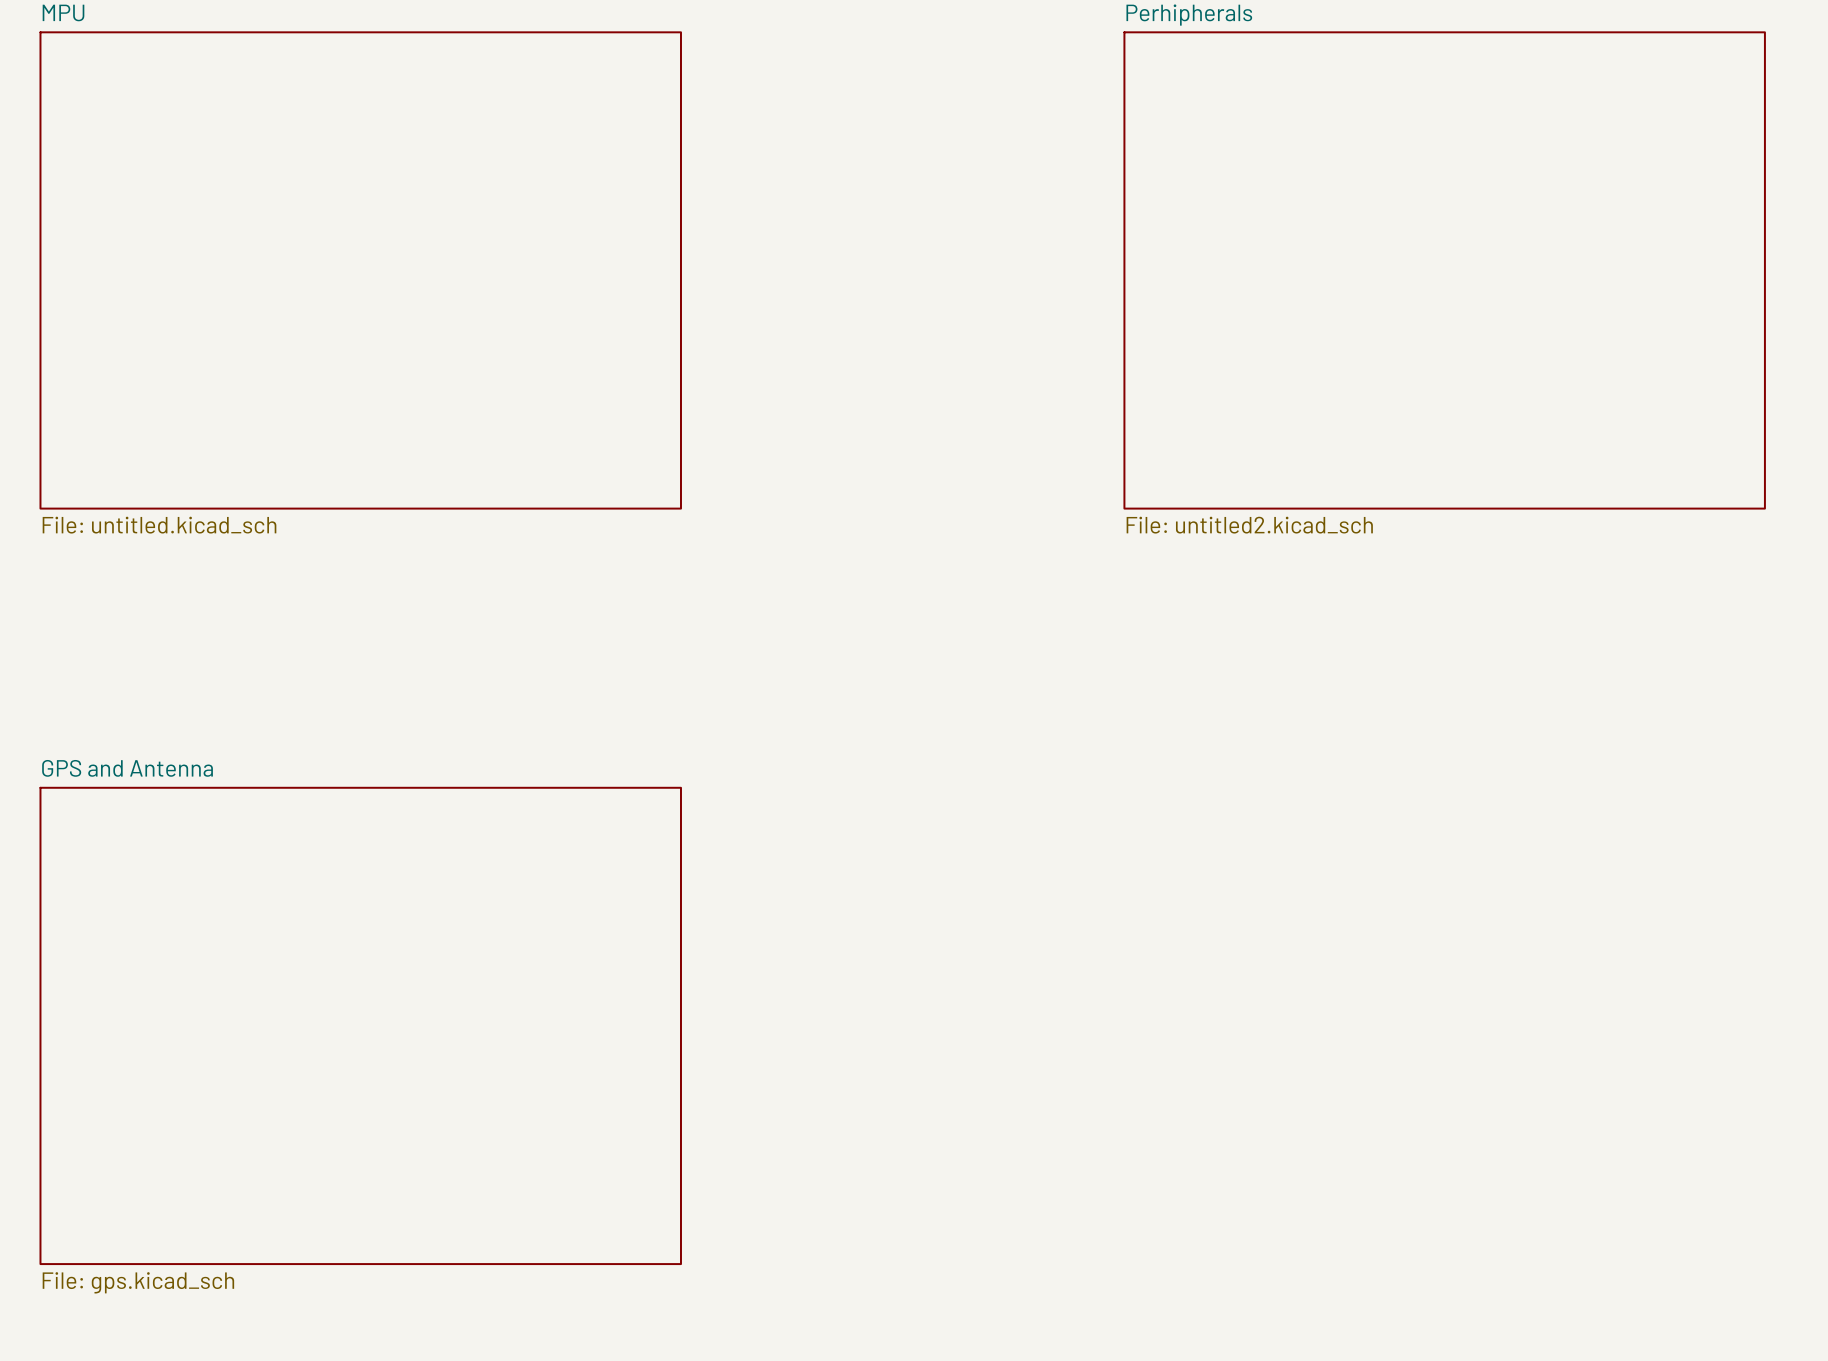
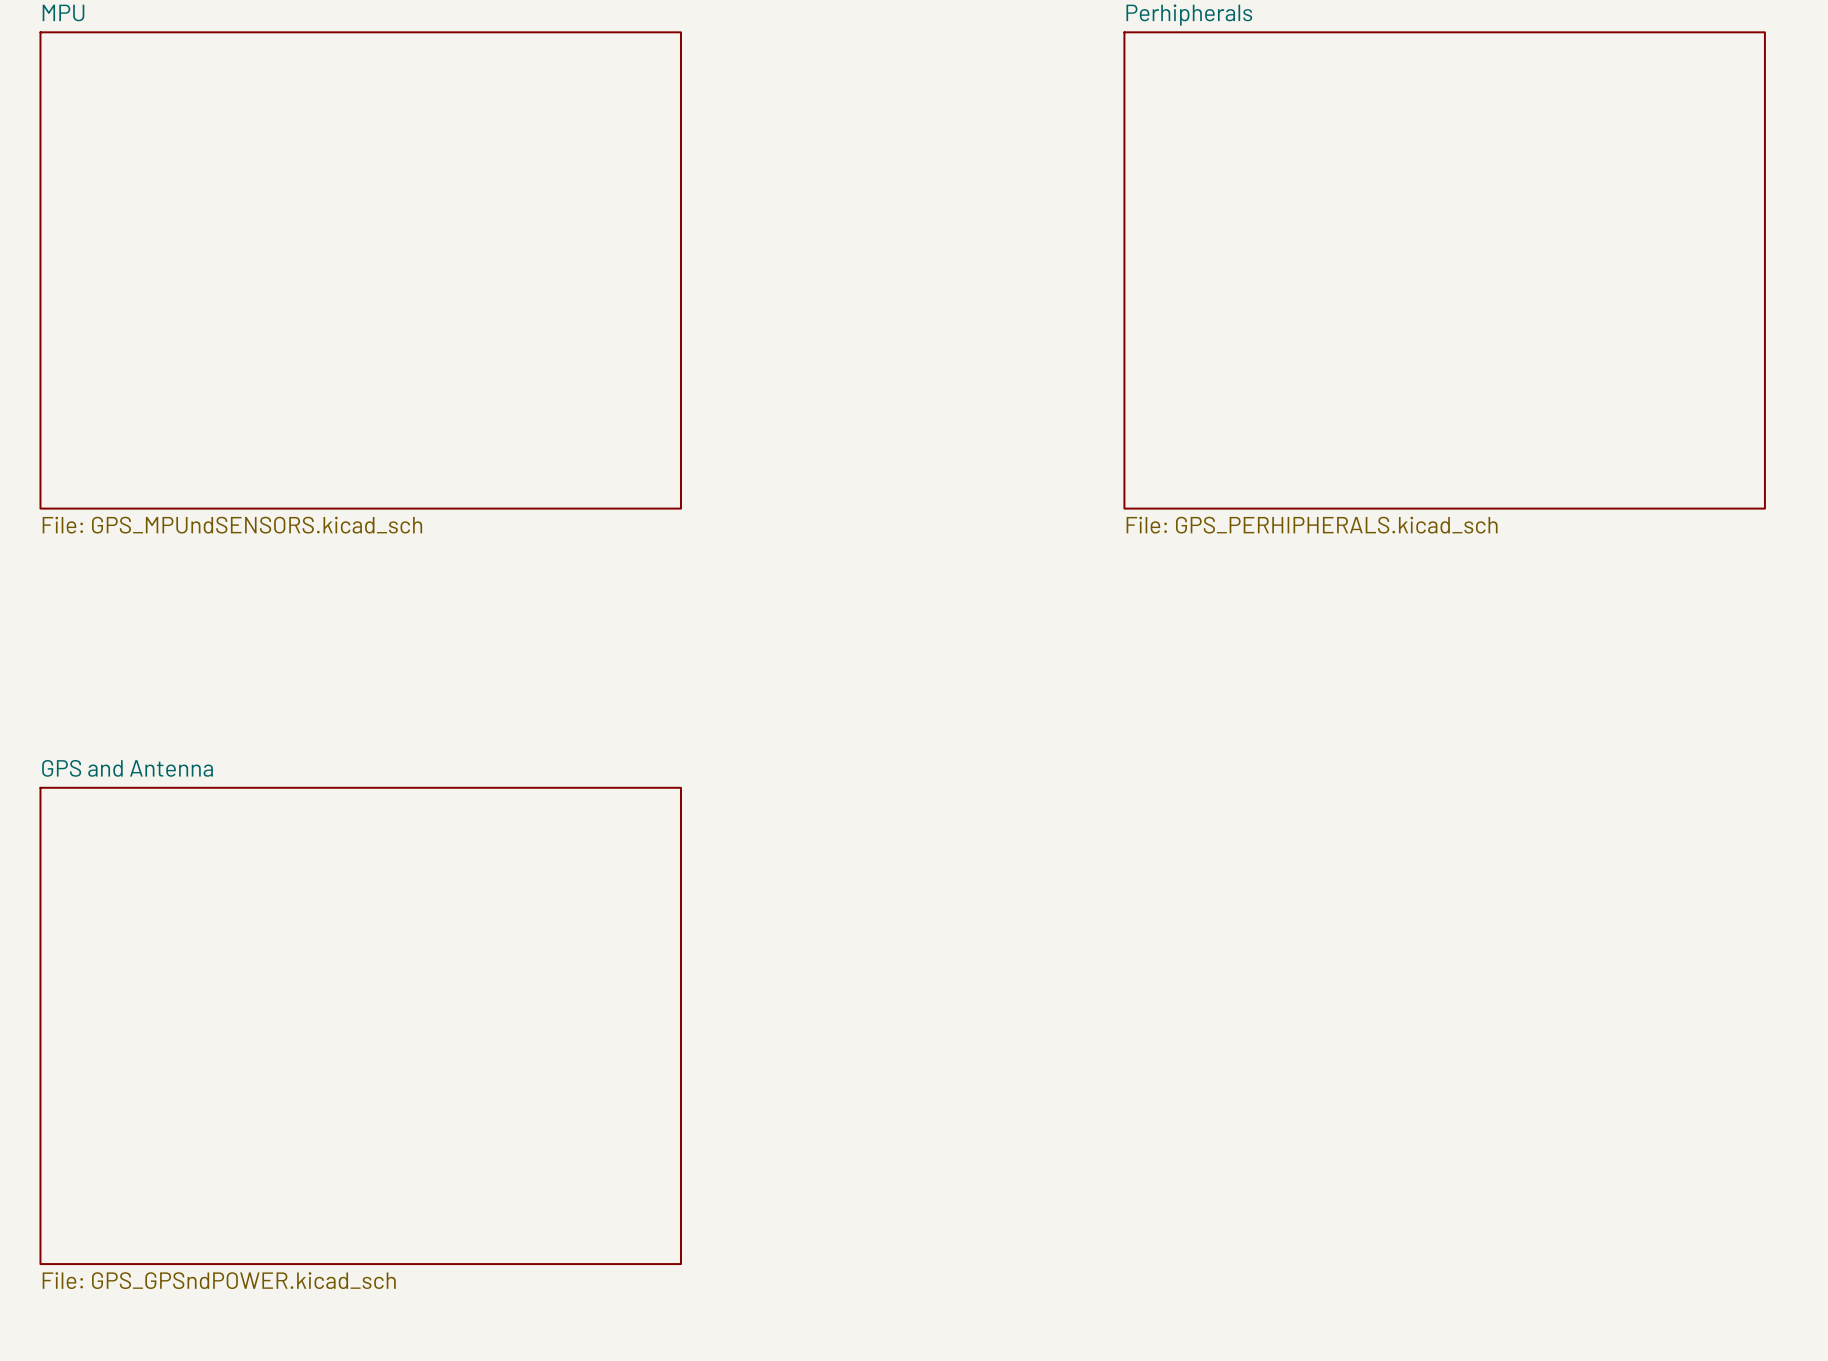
sheet MPU value: File: untitled.kicad_sch (159, 525) -> File: GPS_MPUndSENSORS.kicad_sch (232, 525)
sheet Perhipherals value: File: untitled2.kicad_sch (1249, 525) -> File: GPS_PERHIPHERALS.kicad_sch (1312, 525)
sheet GPS and Antenna value: File: gps.kicad_sch (138, 1282) -> File: GPS_GPSndPOWER.kicad_sch (219, 1280)

